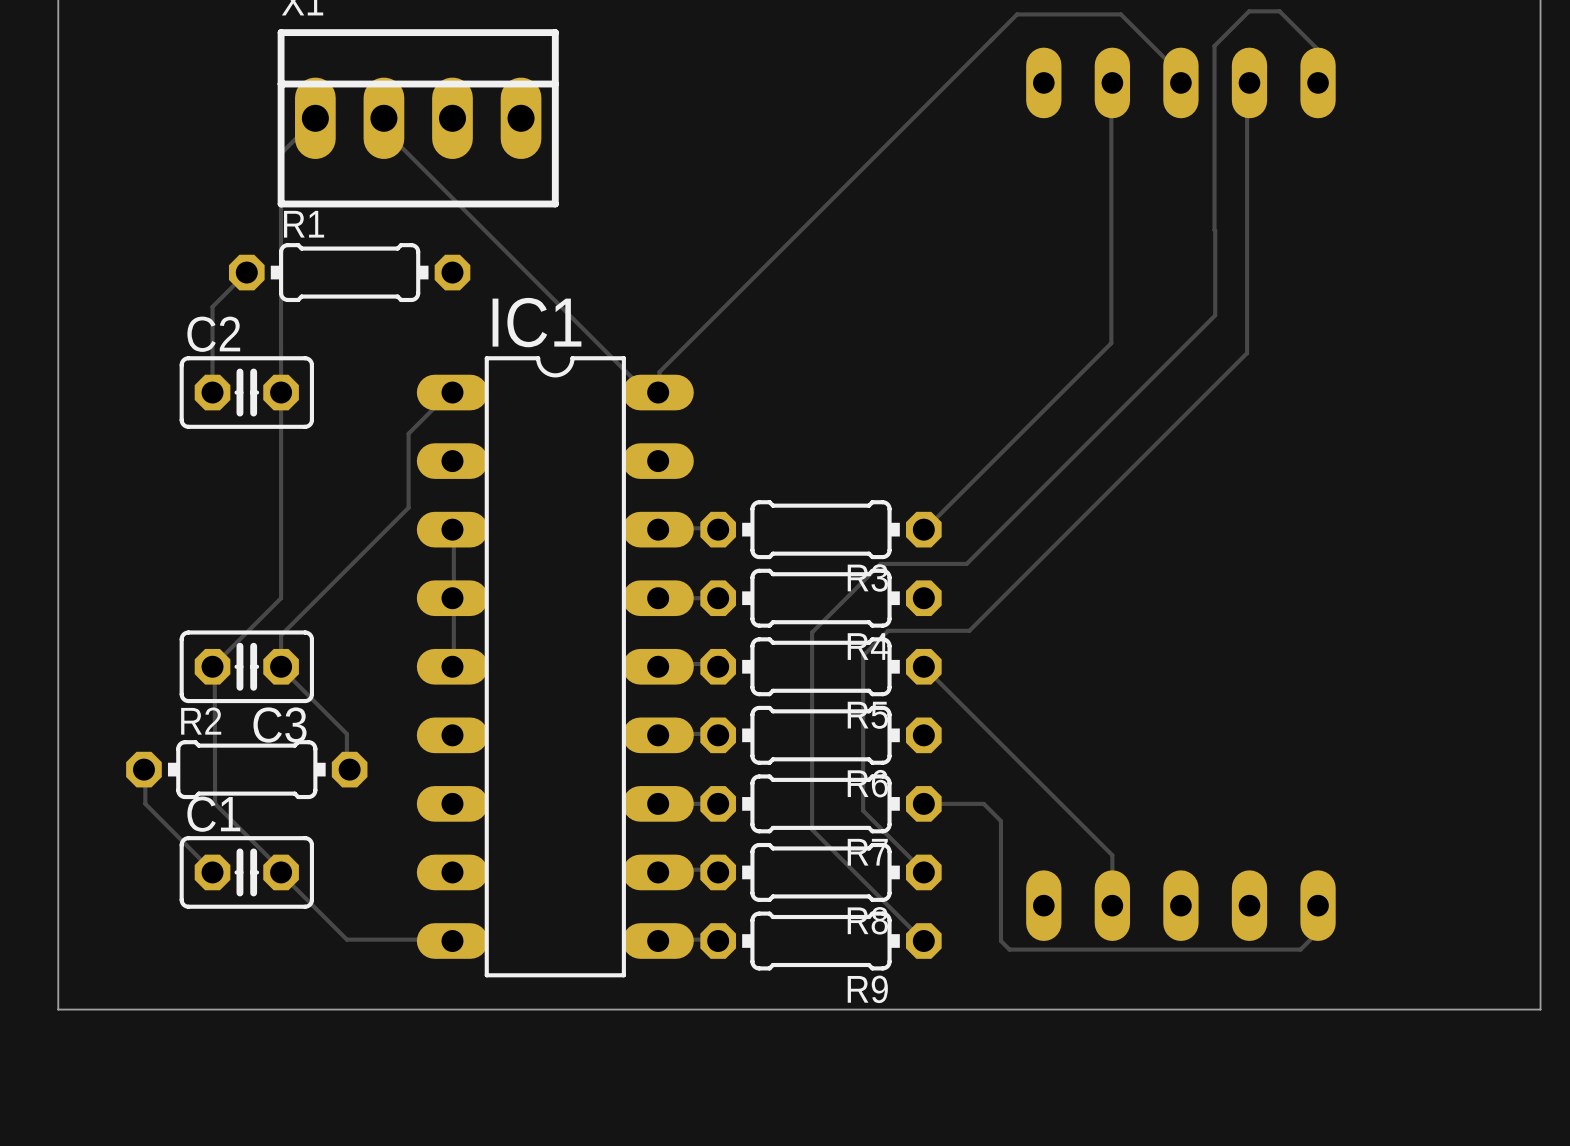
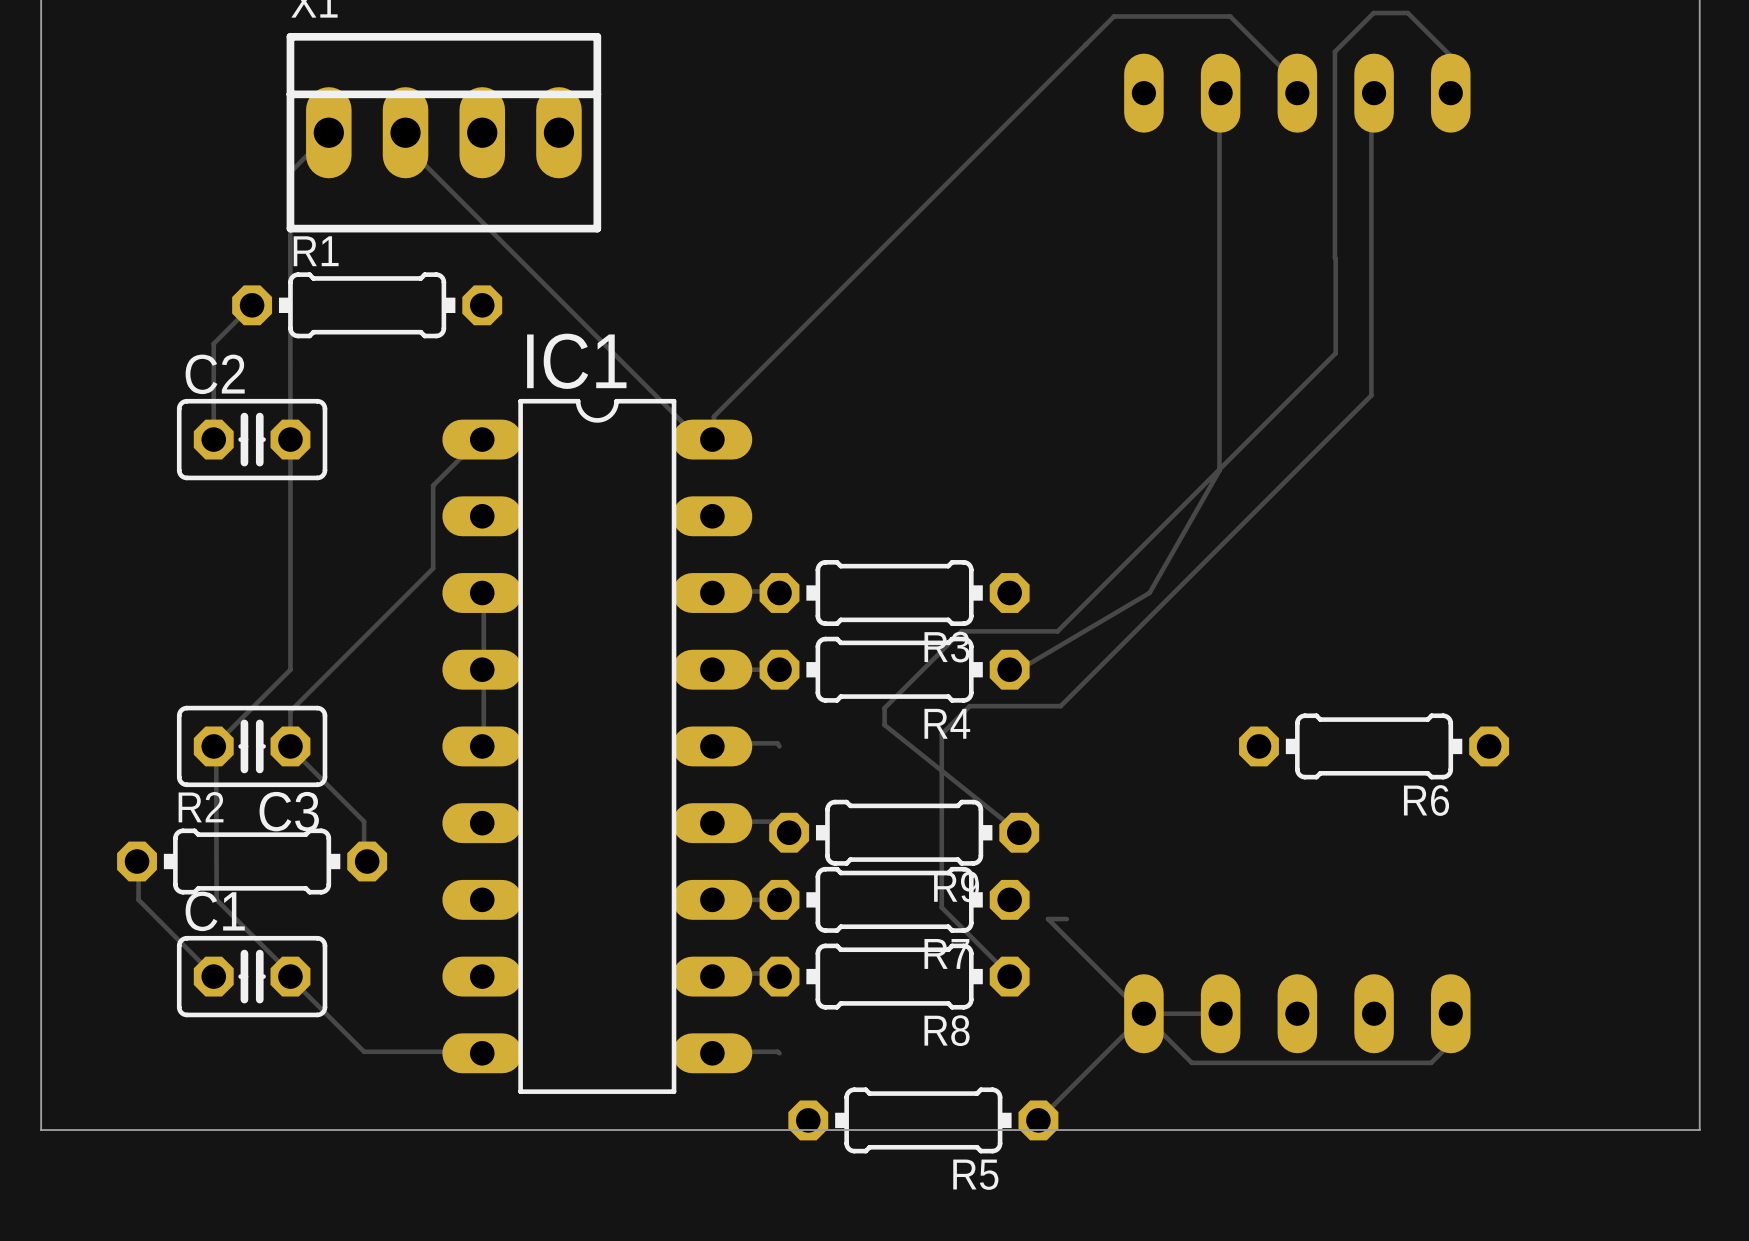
track: (1111, 343) (923, 529) -> (1219, 384) (1219, 470) (1149, 592) (1019, 669)
track: (812, 647) (812, 829) (923, 941) -> (884, 725) (1019, 832)
R5 position: (820, 666) -> (923, 1120)
track: (926, 668) (923, 666) (1112, 855) (1112, 905) -> (1041, 1121) (1038, 1120) (1145, 1013) (1220, 1013)
R6 position: (820, 735) -> (1374, 746)
track: (923, 803) (983, 803) (1000, 821) (1000, 941) (1009, 949) (1086, 949) -> (1066, 919) (1048, 919) (1191, 1062)
R9 position: (820, 941) -> (904, 832)

